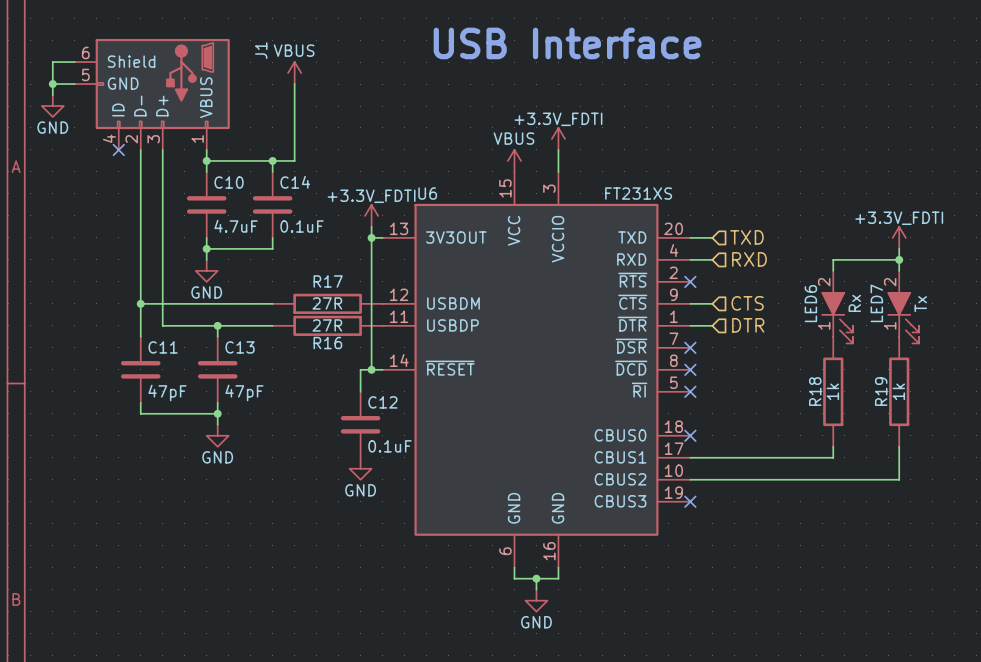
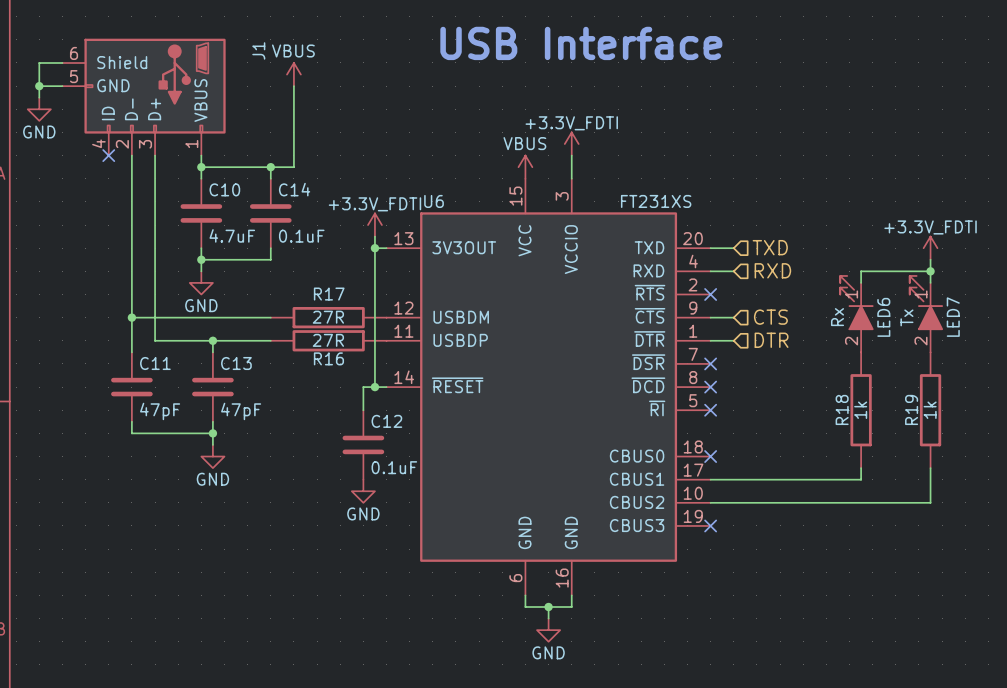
LED6 rotation: 0° (837, 317) -> 180° (856, 303)
LED7 rotation: 0° (903, 317) -> 180° (926, 303)

